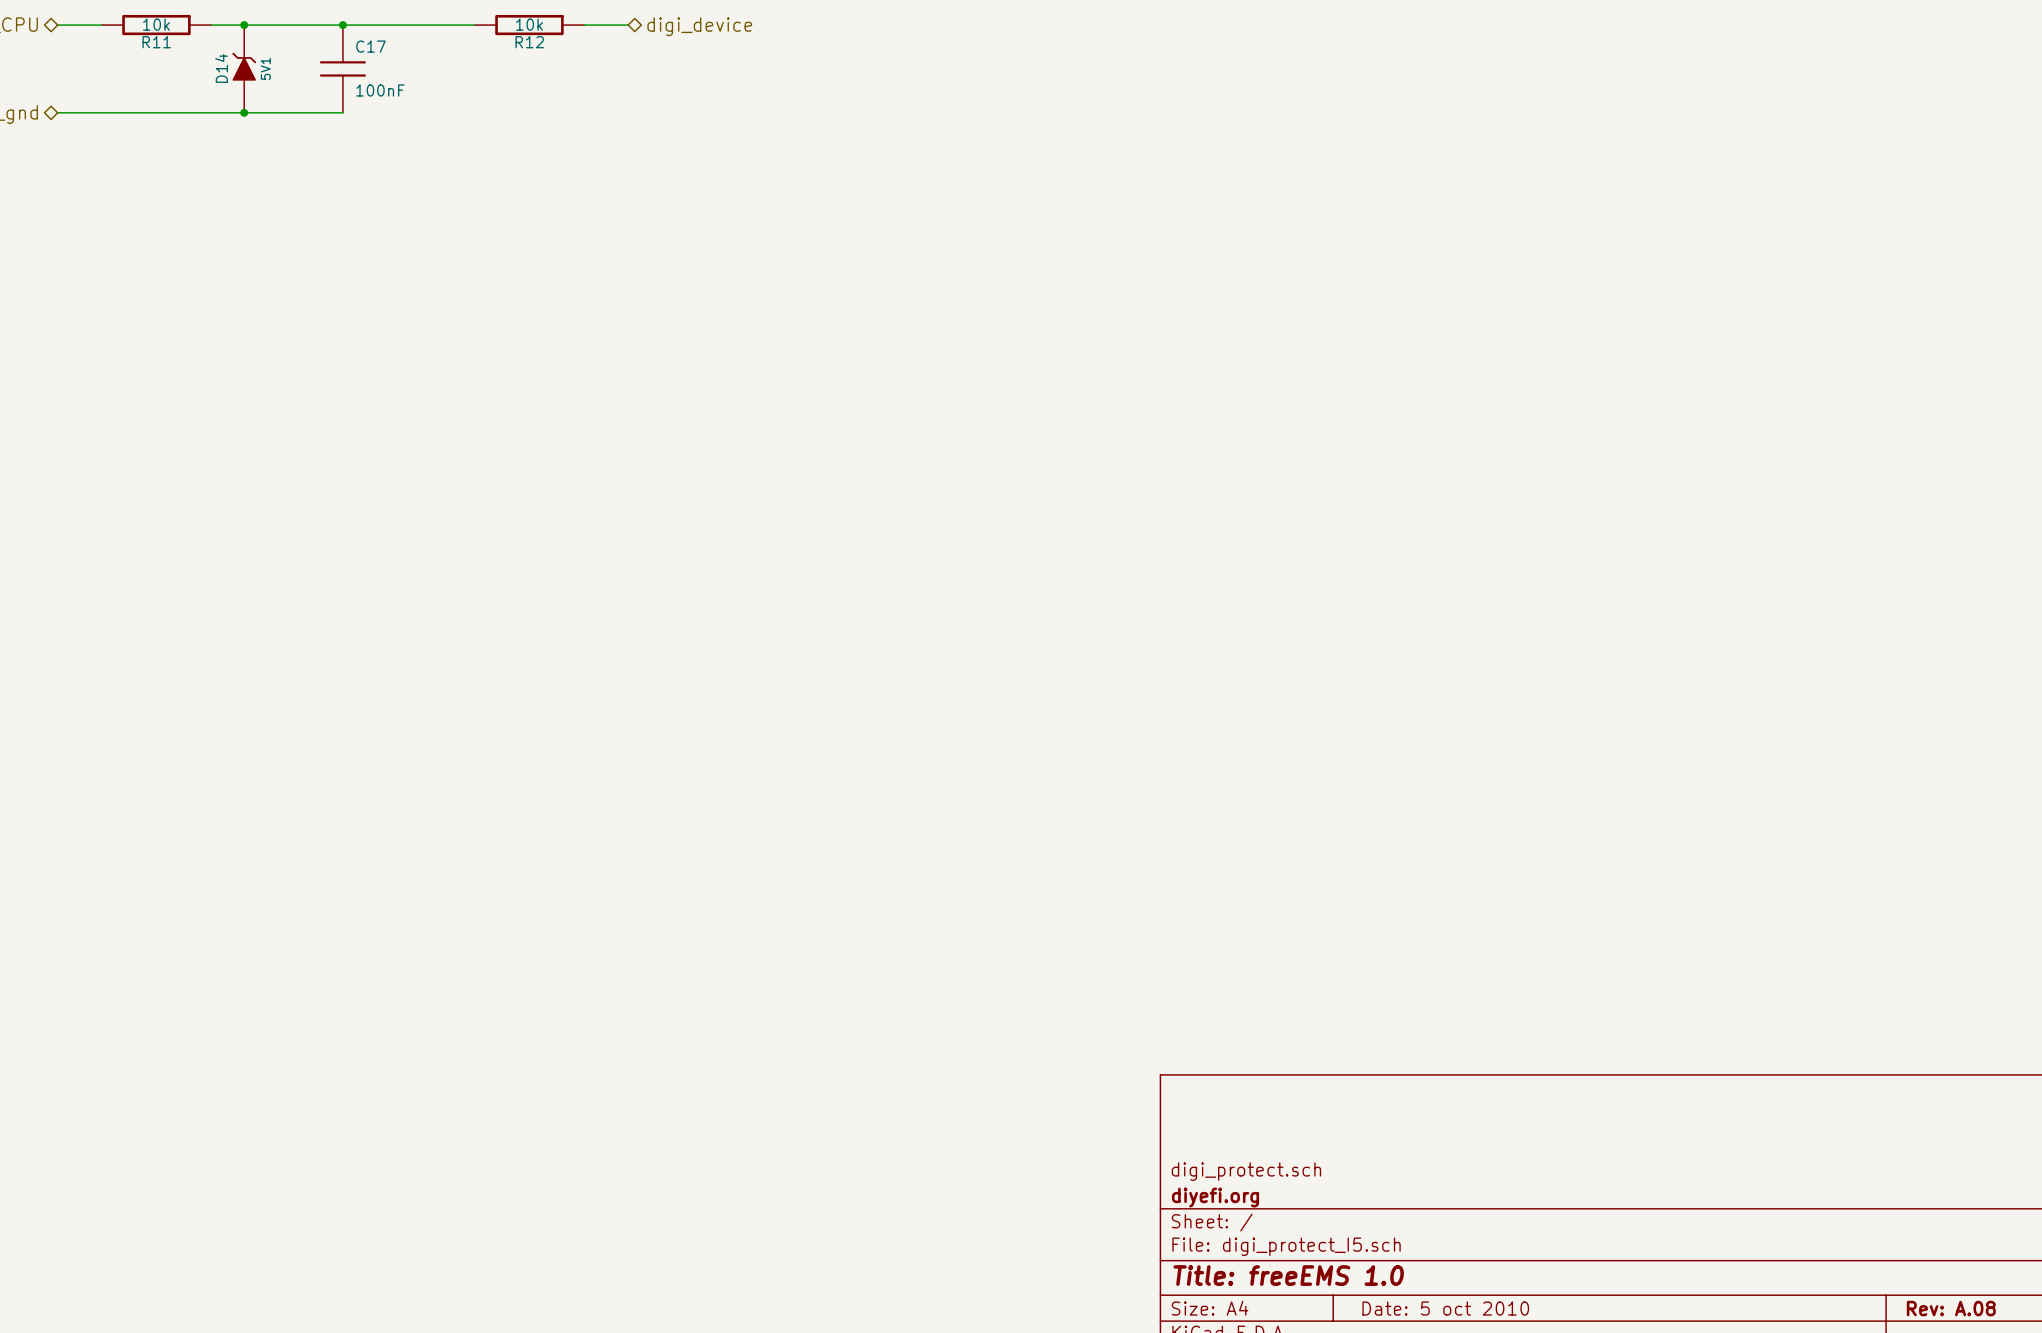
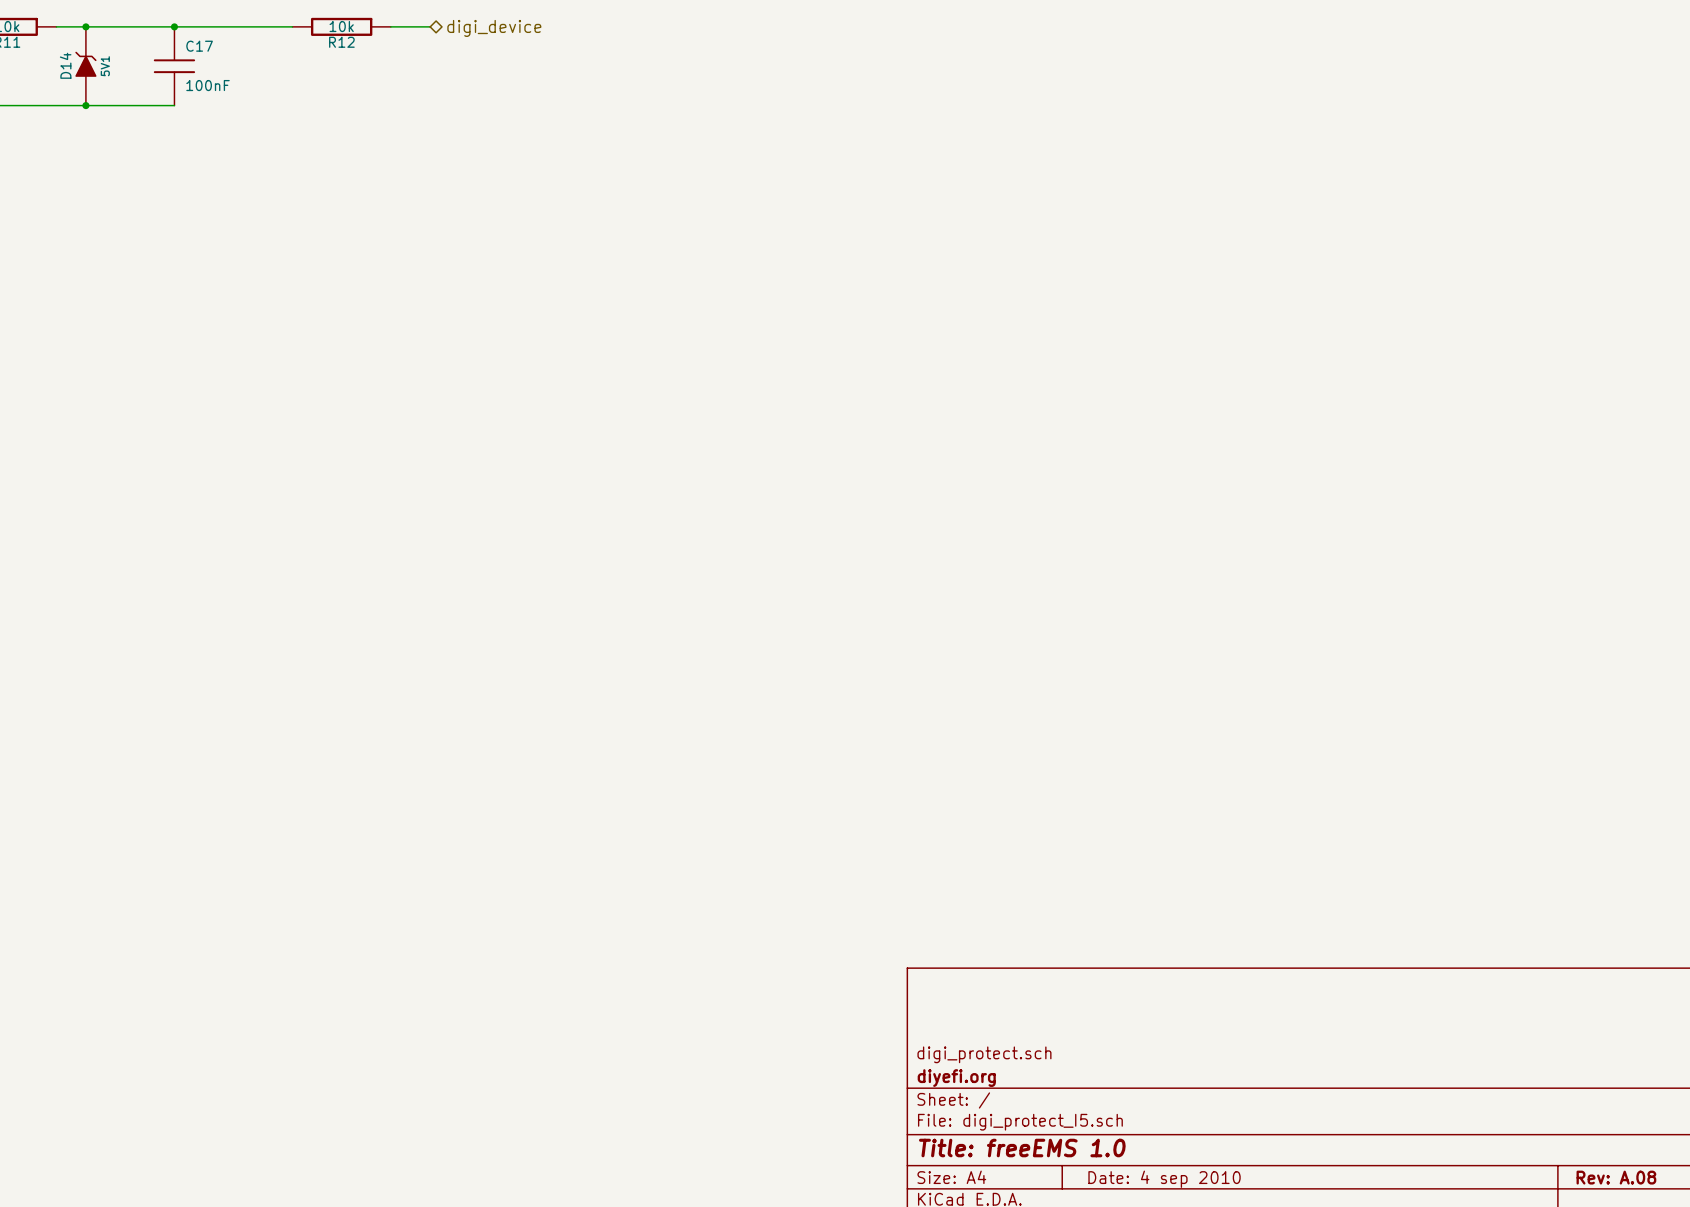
title block: Date: 5 oct 2010 (1445, 1308) -> Date: 4 sep 2010 (1164, 1179)

